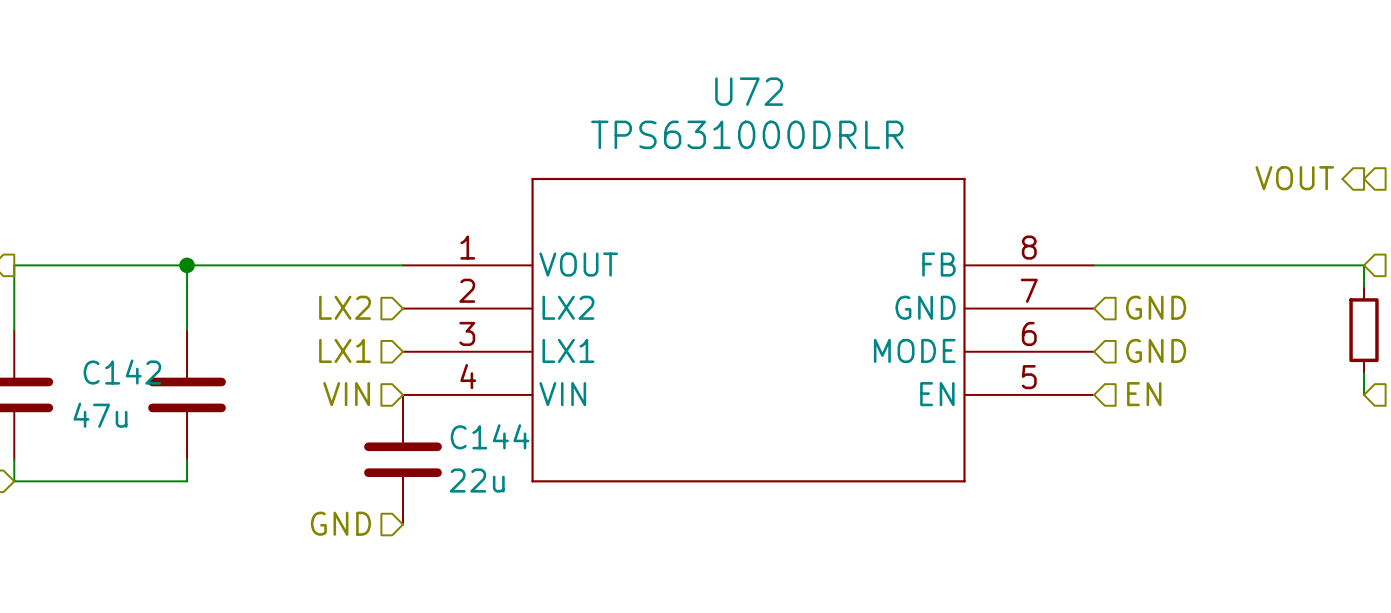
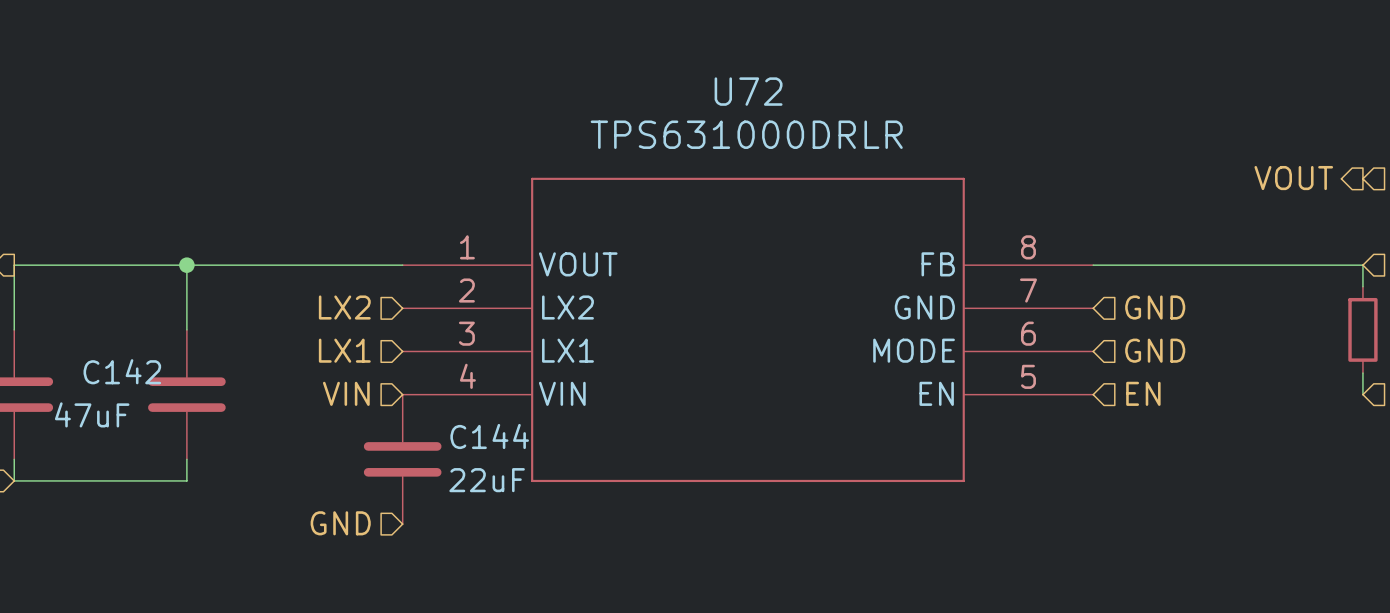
part value: 47u (100, 415) -> 47uF (92, 414)
C144 value: 22u (477, 480) -> 22uF (487, 480)

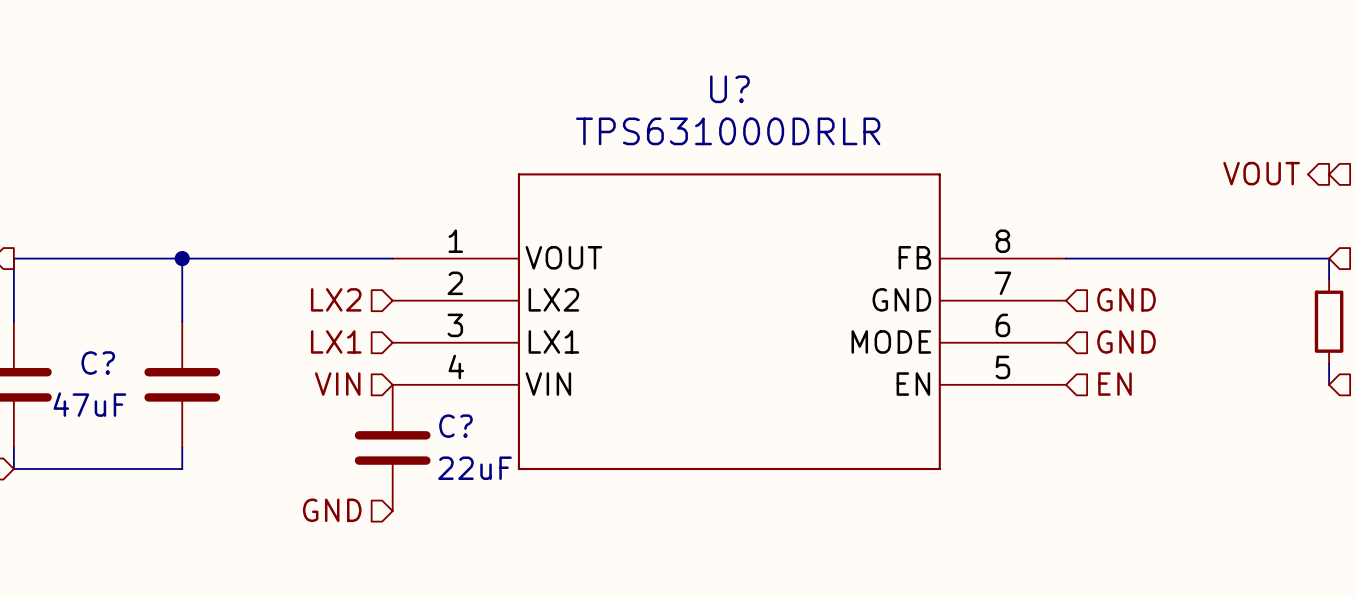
U72 name: U72 (748, 91) -> U? (729, 89)
C142 name: C142 (122, 371) -> C? (98, 363)
C144 name: C144 (489, 436) -> C? (455, 426)

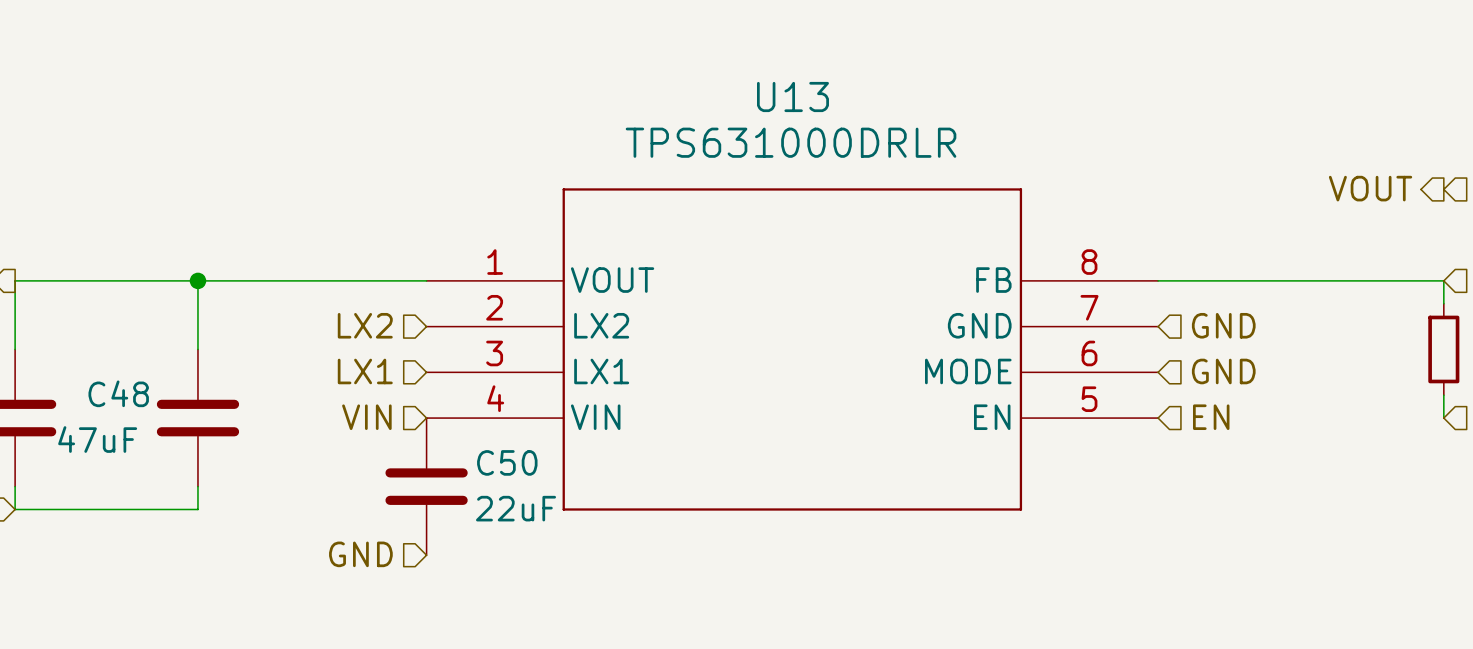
U? name: U? (729, 89) -> U13 (792, 97)
C? name: C? (98, 363) -> C48 (118, 393)
C? name: C? (455, 426) -> C50 (507, 462)

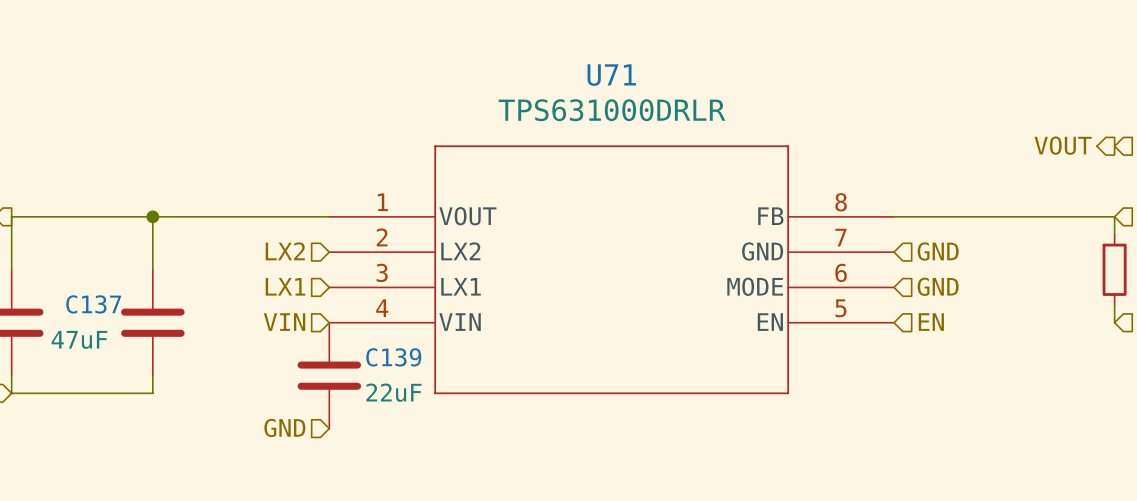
U13 name: U13 (792, 97) -> U71 (611, 75)
C48 name: C48 (118, 393) -> C137 (93, 304)
C50 name: C50 (507, 462) -> C139 (393, 357)

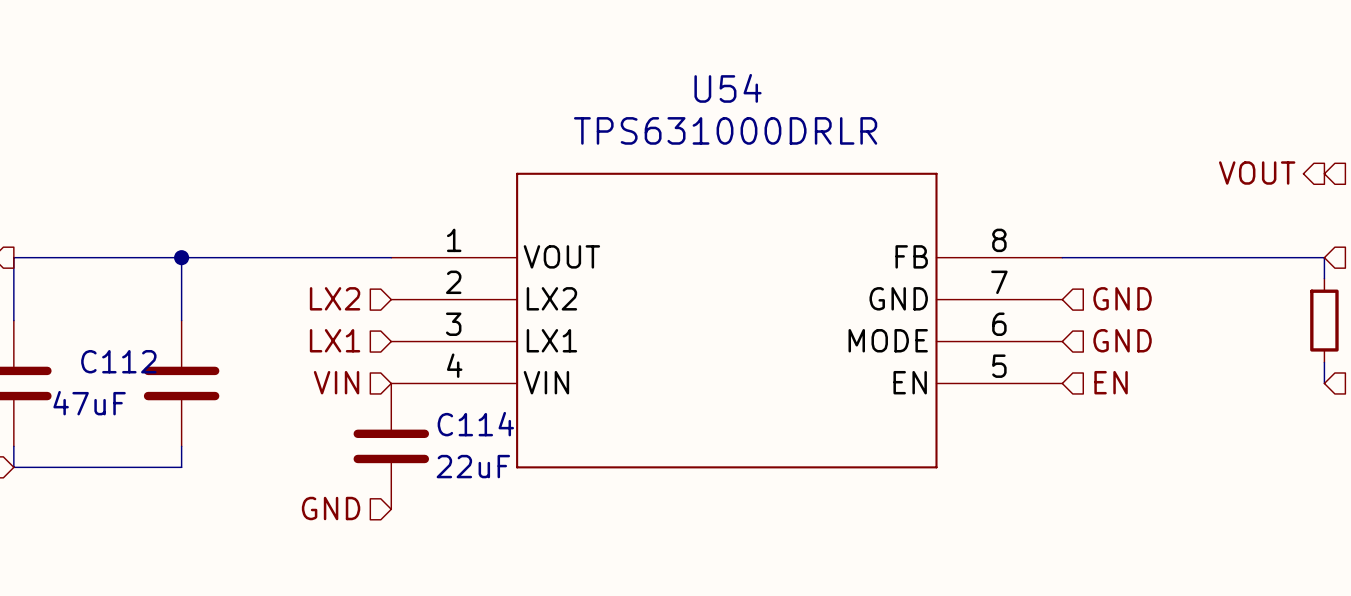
U71 name: U71 (611, 75) -> U54 (728, 88)
C137 name: C137 (93, 304) -> C112 (118, 361)
C139 name: C139 (393, 357) -> C114 (475, 424)

